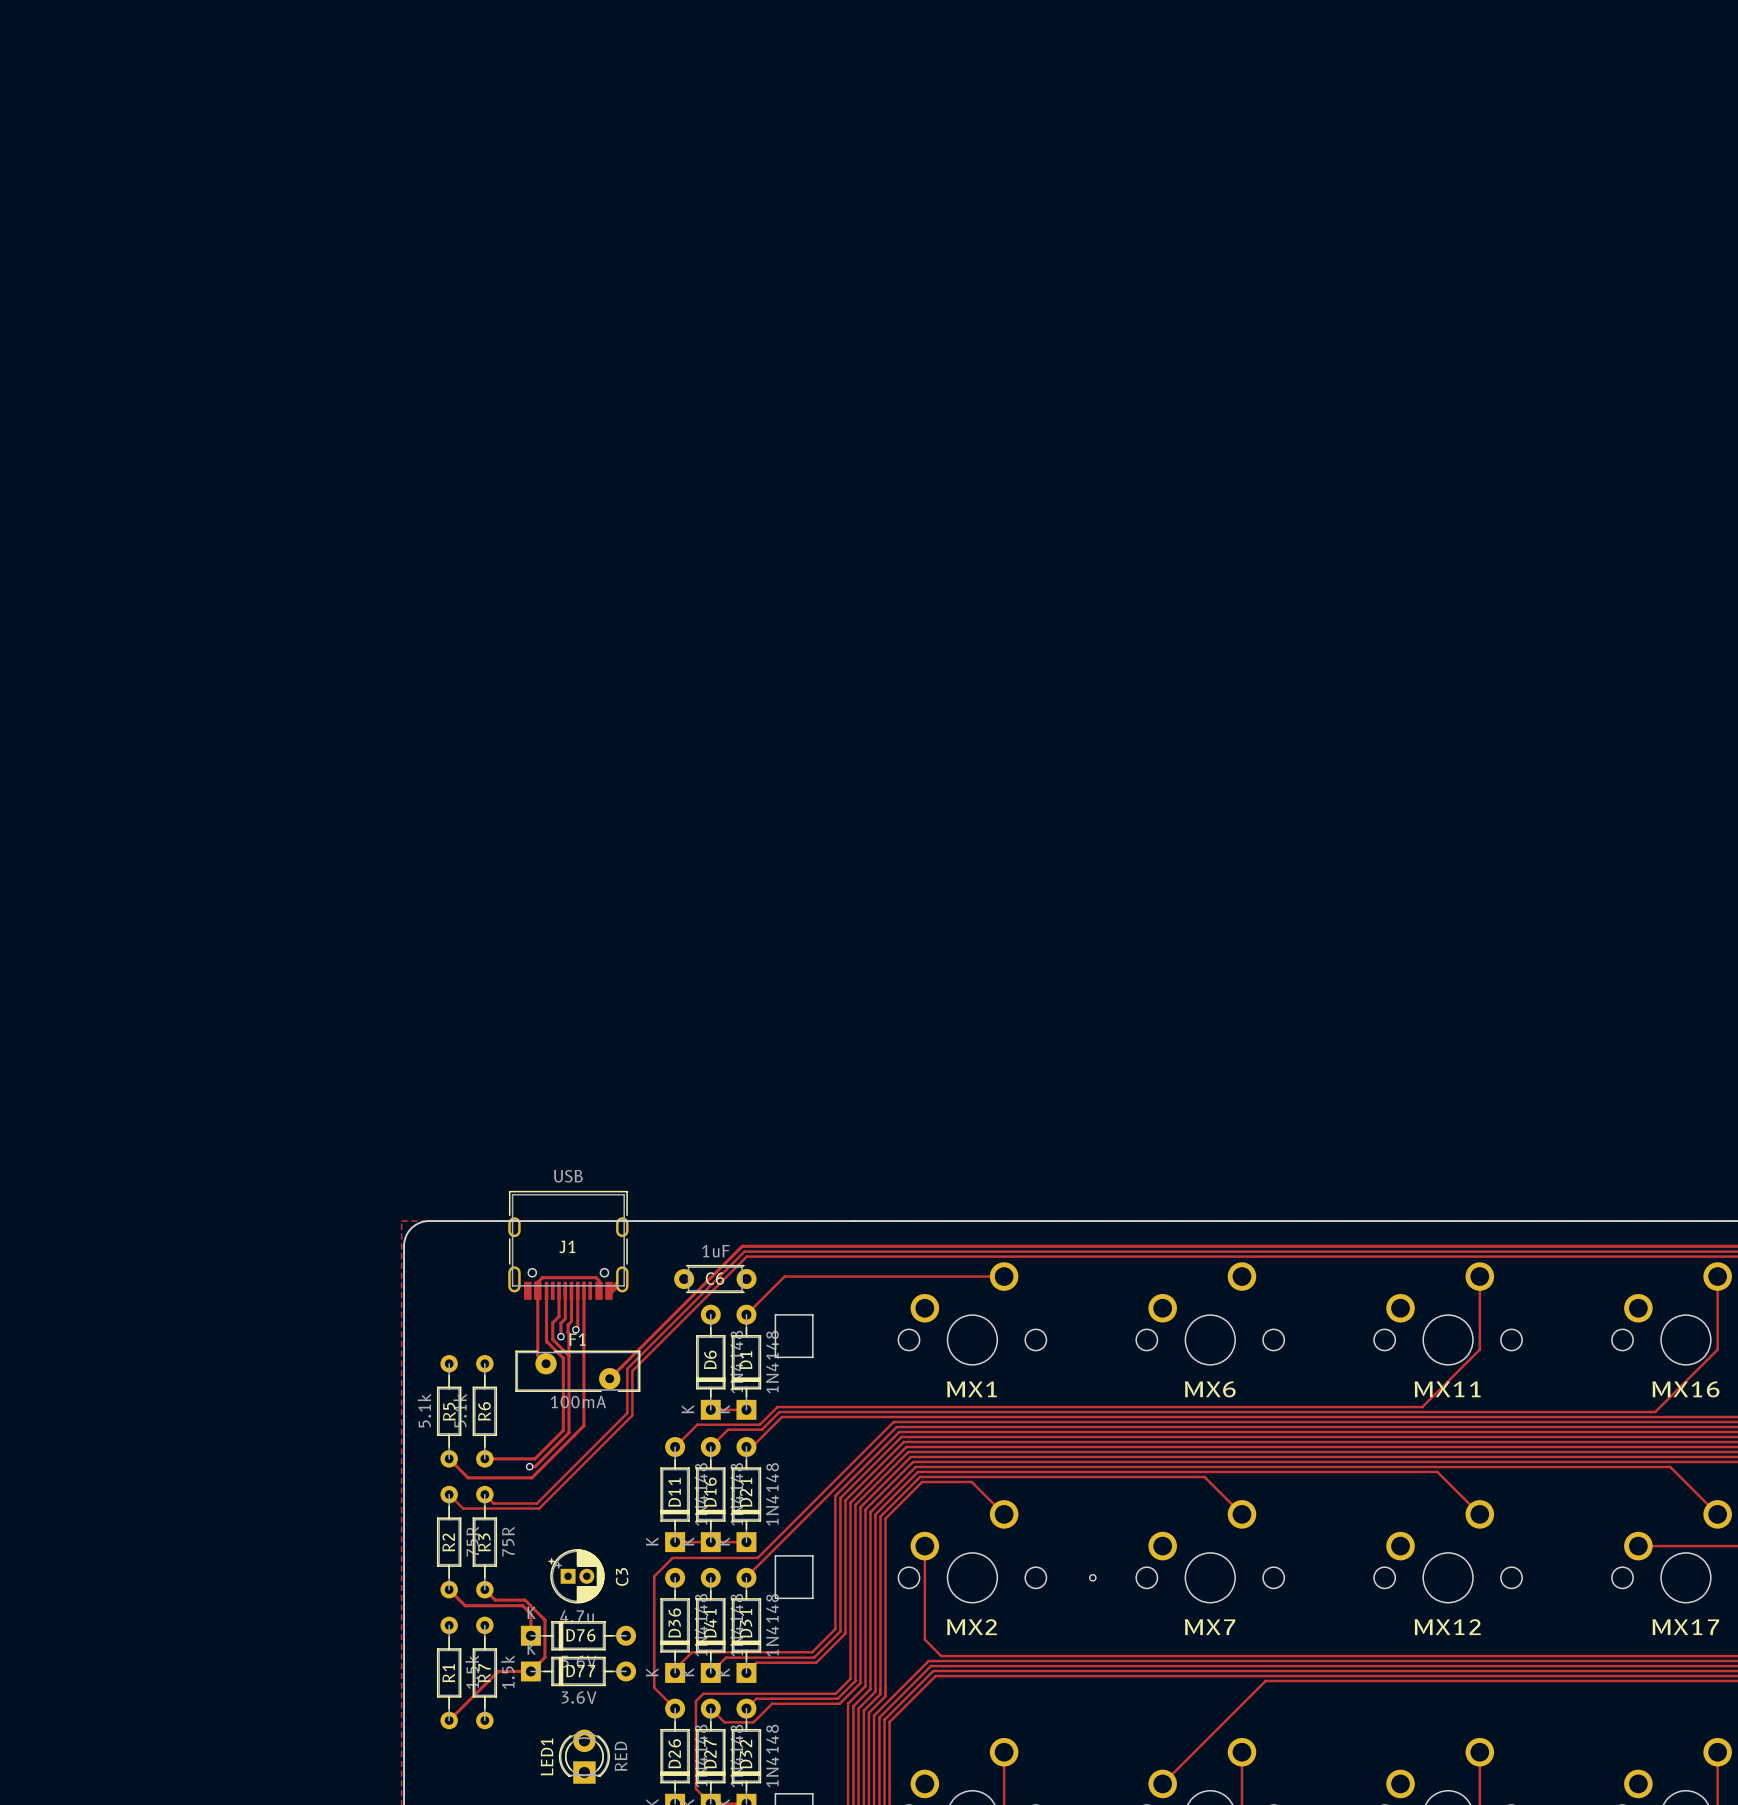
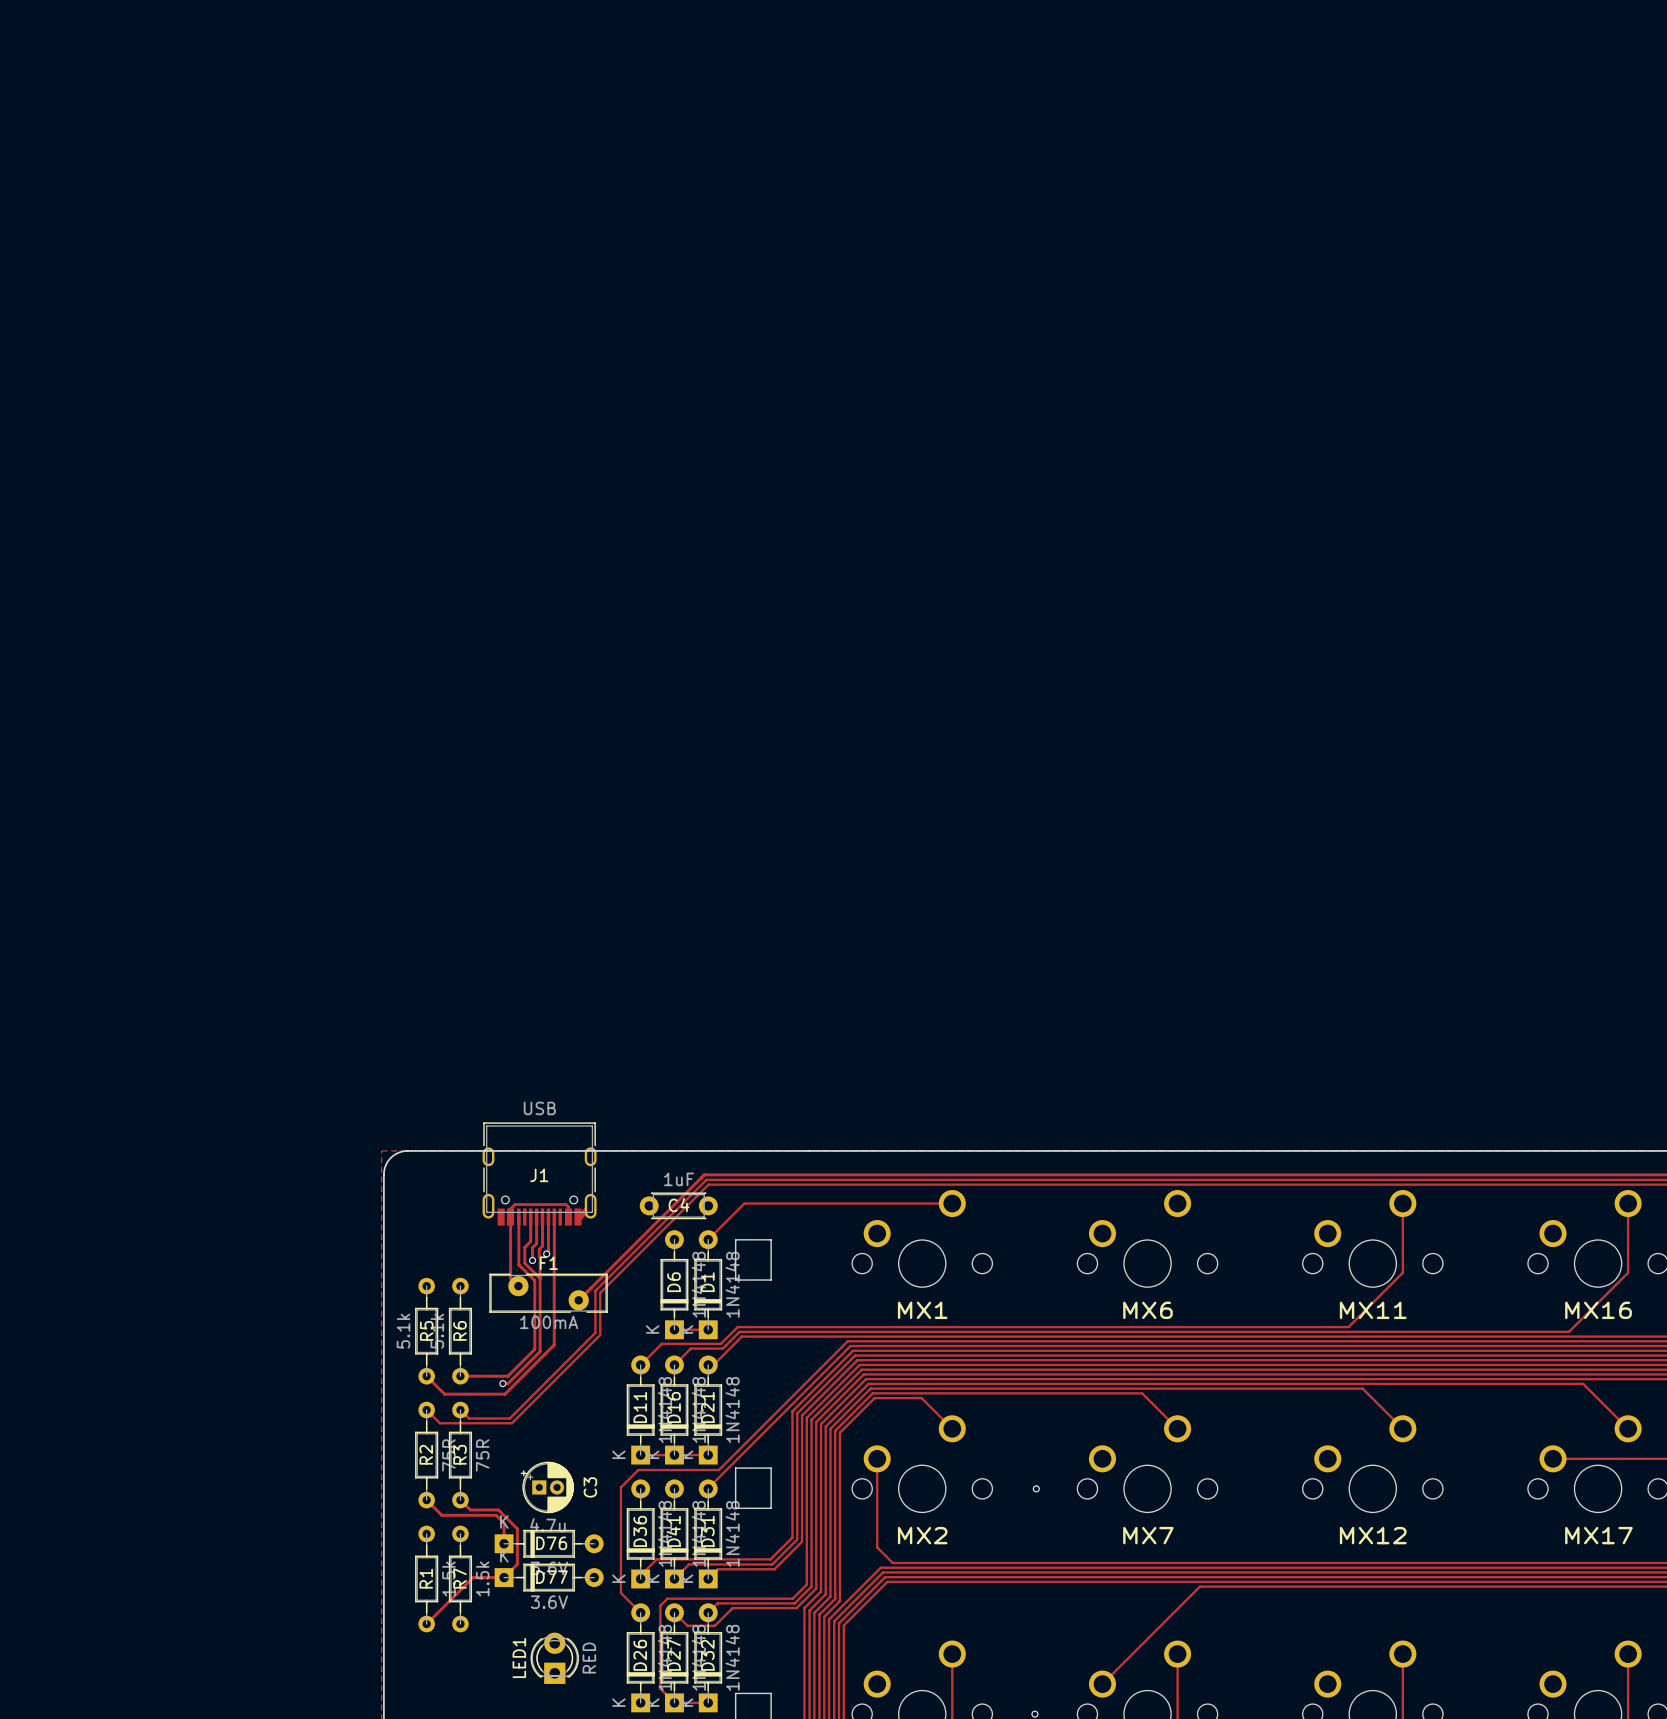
C6 name: C6 (715, 1278) -> C4 (679, 1205)

